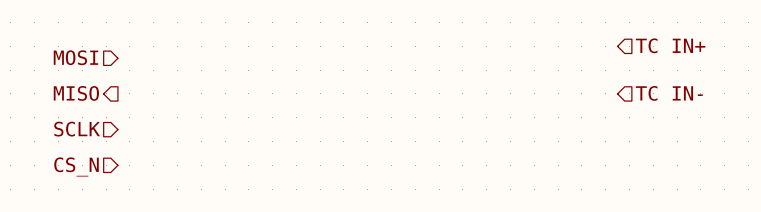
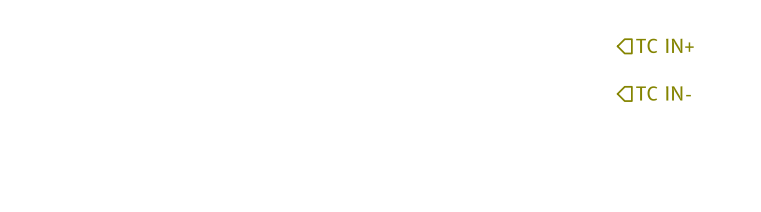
hierarchical label: MOSI (75, 57) -> none
hierarchical label: MISO (76, 93) -> none
hierarchical label: SCLK (77, 129) -> none
hierarchical label: CS_N (76, 166) -> none

